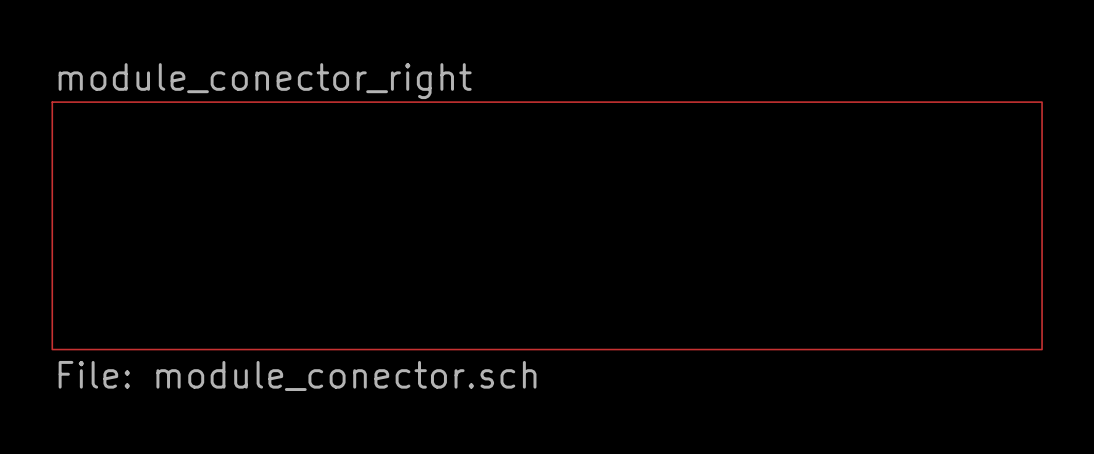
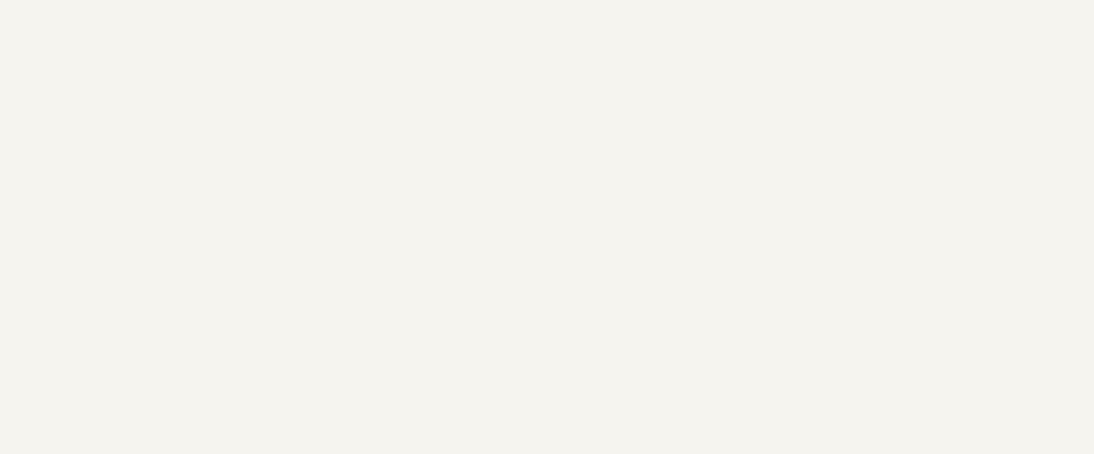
sheet module_conector_right: File: module_conector.sch (547, 225) -> none

